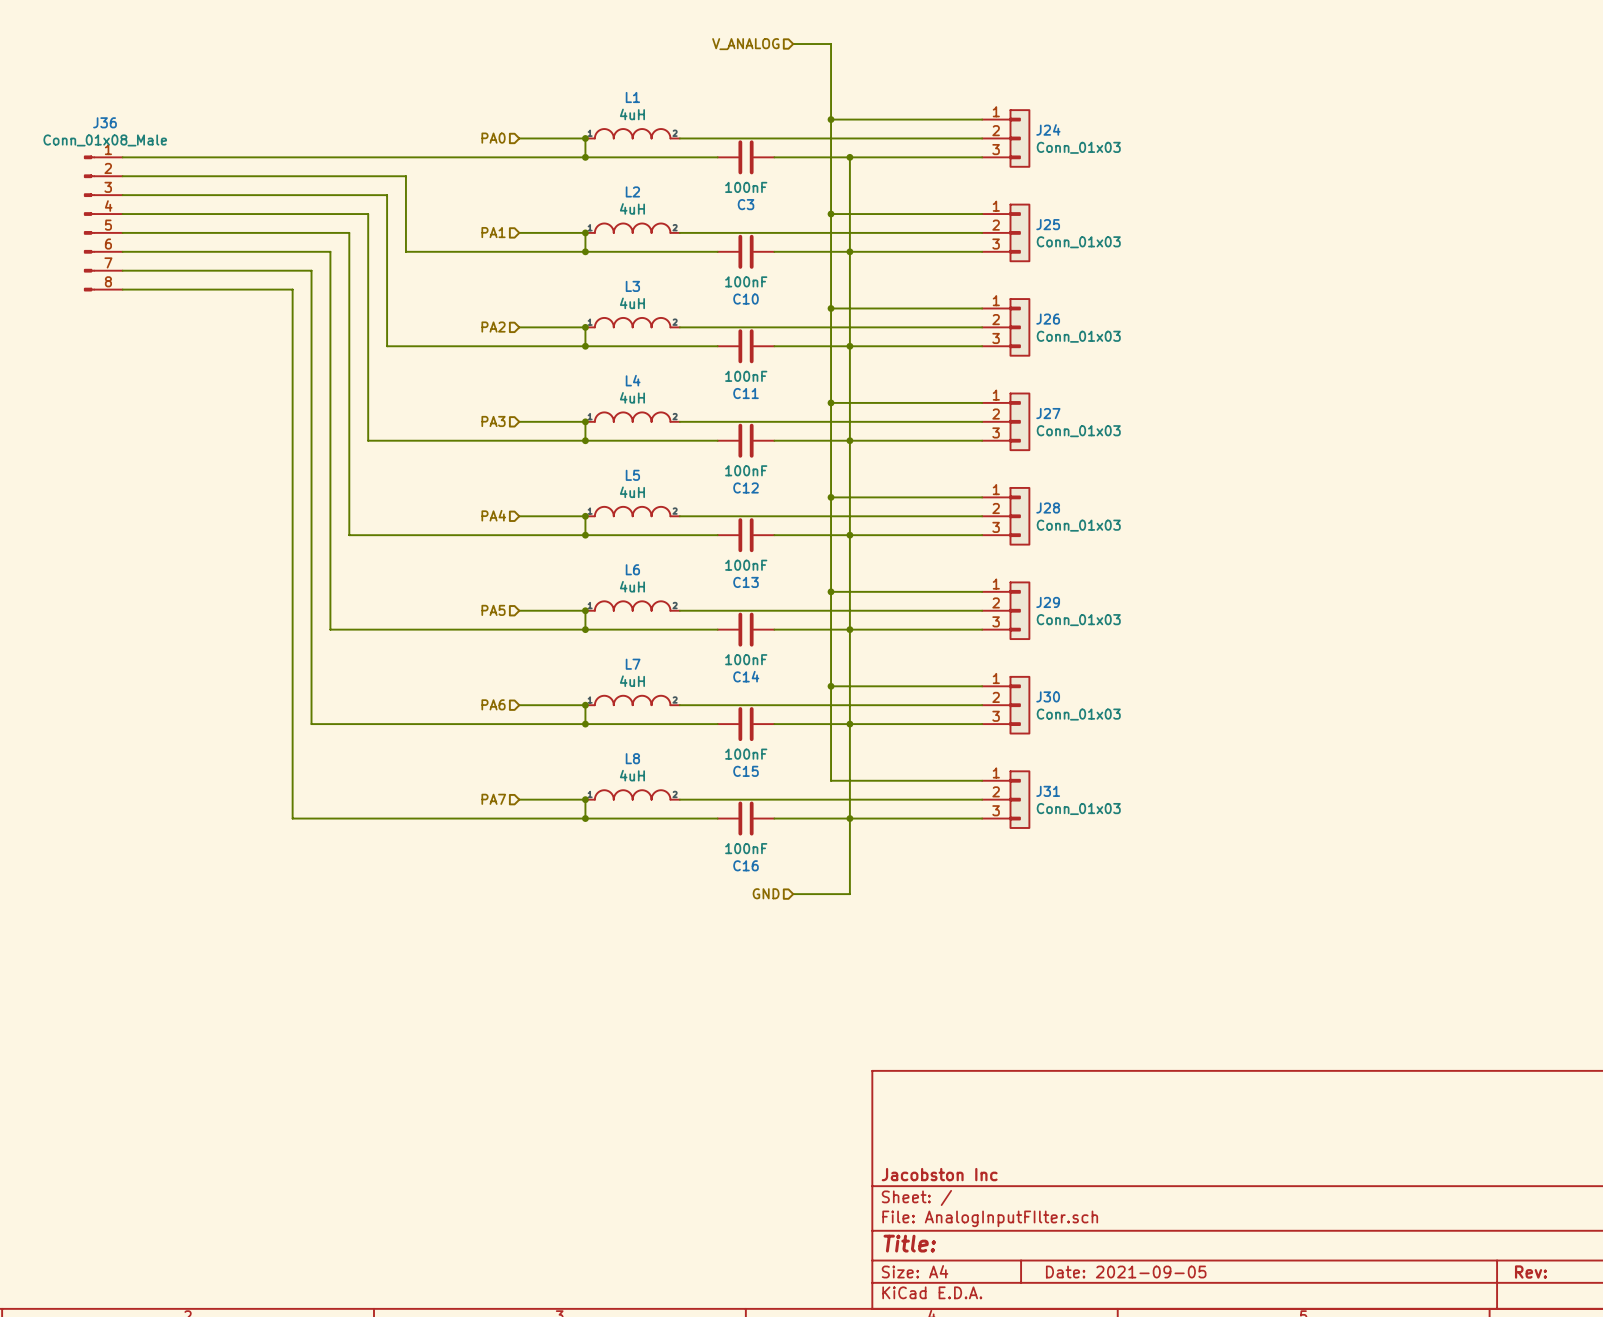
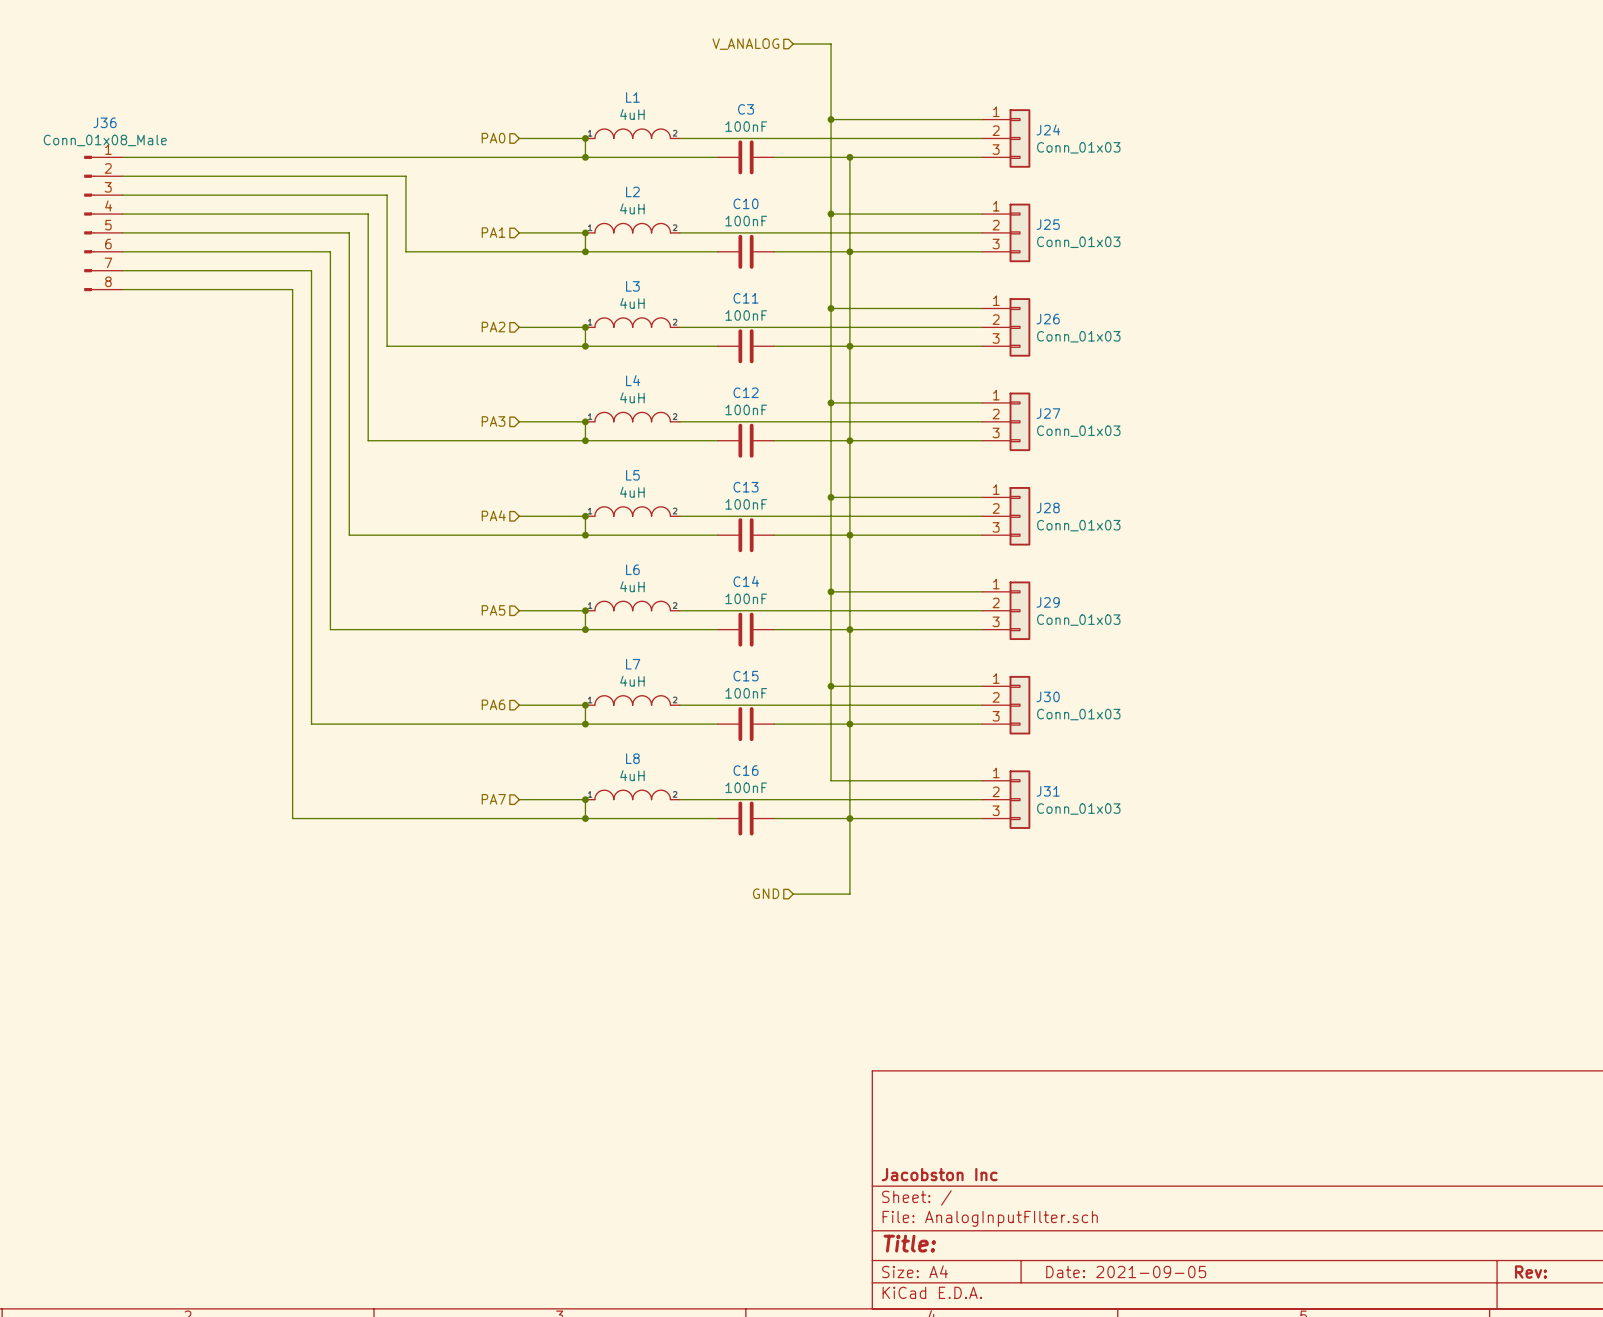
C3 value position: 100nF (746, 187) -> 100nF (746, 126)
C3 name position: C3 (746, 204) -> C3 (746, 109)
C10 value position: 100nF (746, 281) -> 100nF (746, 221)
C10 name position: C10 (746, 299) -> C10 (746, 203)
C11 value position: 100nF (746, 376) -> 100nF (746, 315)
C11 name position: C11 (746, 393) -> C11 (746, 298)
C12 value position: 100nF (746, 470) -> 100nF (746, 409)
C12 name position: C12 (746, 487) -> C12 (746, 392)
C13 value position: 100nF (746, 565) -> 100nF (746, 504)
C13 name position: C13 (746, 582) -> C13 (746, 487)
C14 value position: 100nF (746, 659) -> 100nF (746, 598)
C14 name position: C14 (746, 676) -> C14 (746, 581)
C15 value position: 100nF (746, 754) -> 100nF (746, 693)
C15 name position: C15 (746, 771) -> C15 (746, 676)
C16 value position: 100nF (746, 848) -> 100nF (746, 787)
C16 name position: C16 (746, 865) -> C16 (746, 770)

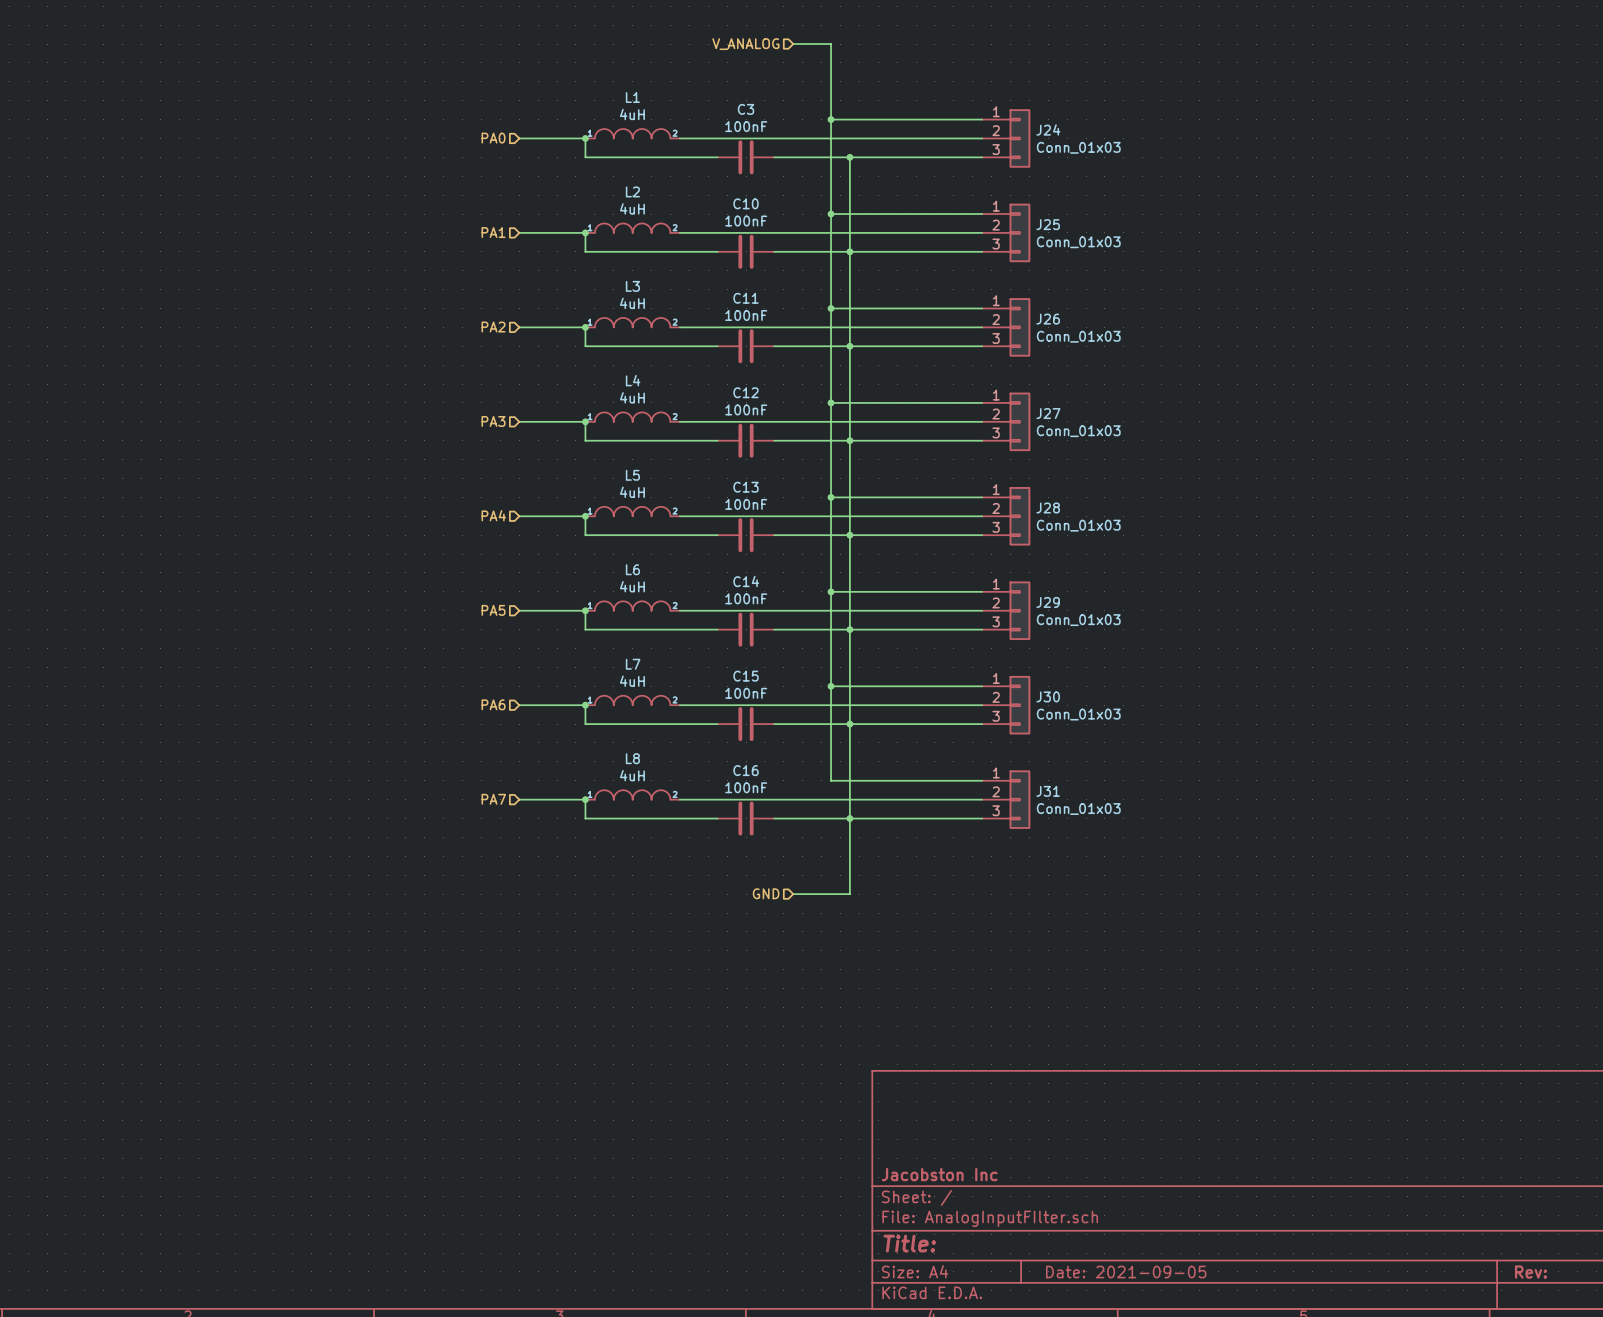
wire: (122, 157) (585, 157) -> none
junction: (585, 157) -> none
wire: (122, 176) (405, 176) (405, 251) (585, 251) -> none
wire: (122, 195) (387, 195) (387, 346) (585, 346) -> none
wire: (122, 214) (368, 214) (368, 440) (585, 440) -> none
J36: Conn_01x08_Male (103, 223) -> none
wire: (122, 232) (349, 232) (349, 535) (585, 535) -> none
wire: (122, 251) (330, 251) (330, 629) (585, 629) -> none
junction: (585, 251) -> none
wire: (122, 270) (311, 270) (311, 724) (585, 724) -> none
wire: (122, 289) (292, 289) (292, 818) (585, 818) -> none
junction: (585, 346) -> none
junction: (585, 440) -> none
junction: (585, 535) -> none
junction: (585, 629) -> none
junction: (585, 724) -> none
junction: (585, 818) -> none

